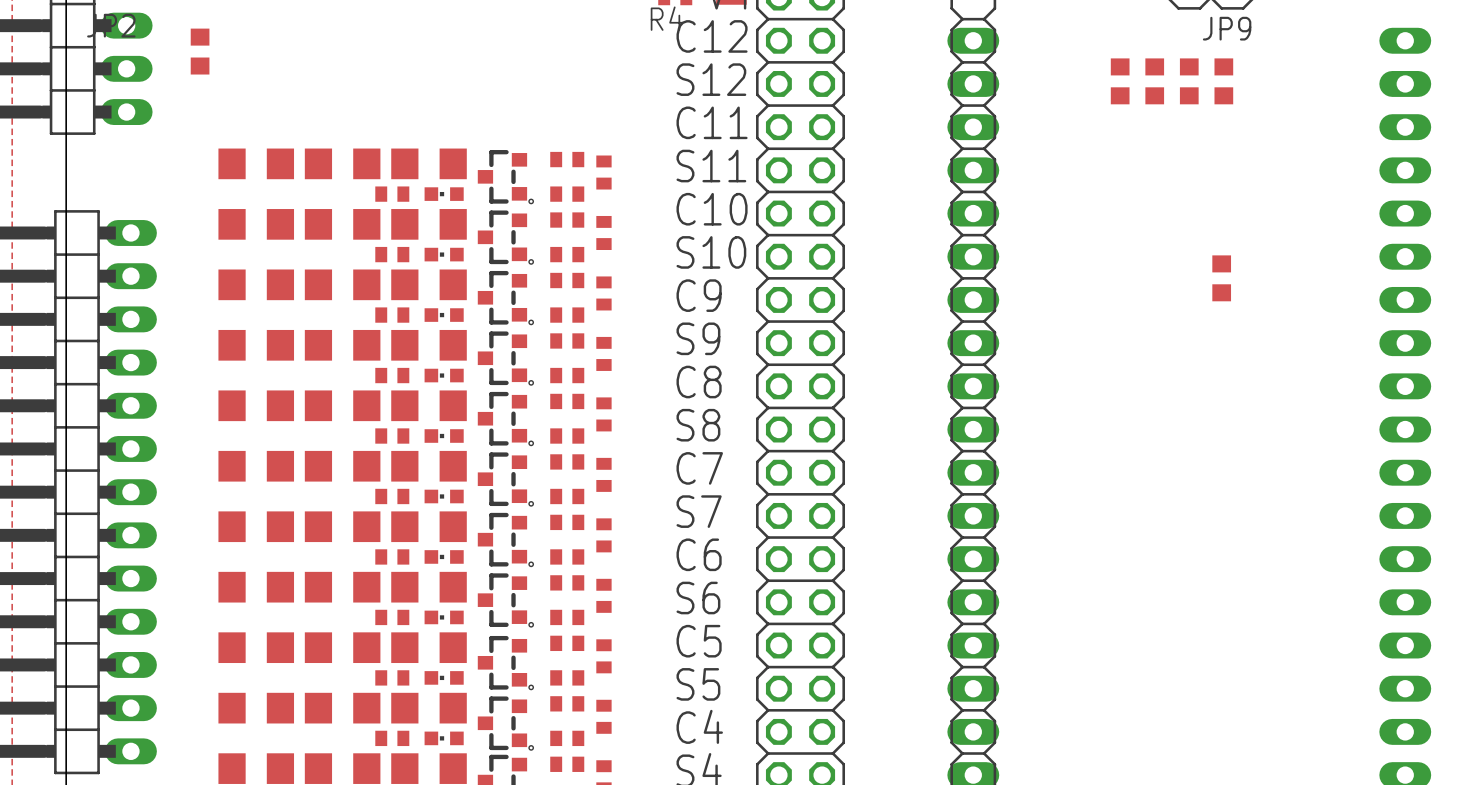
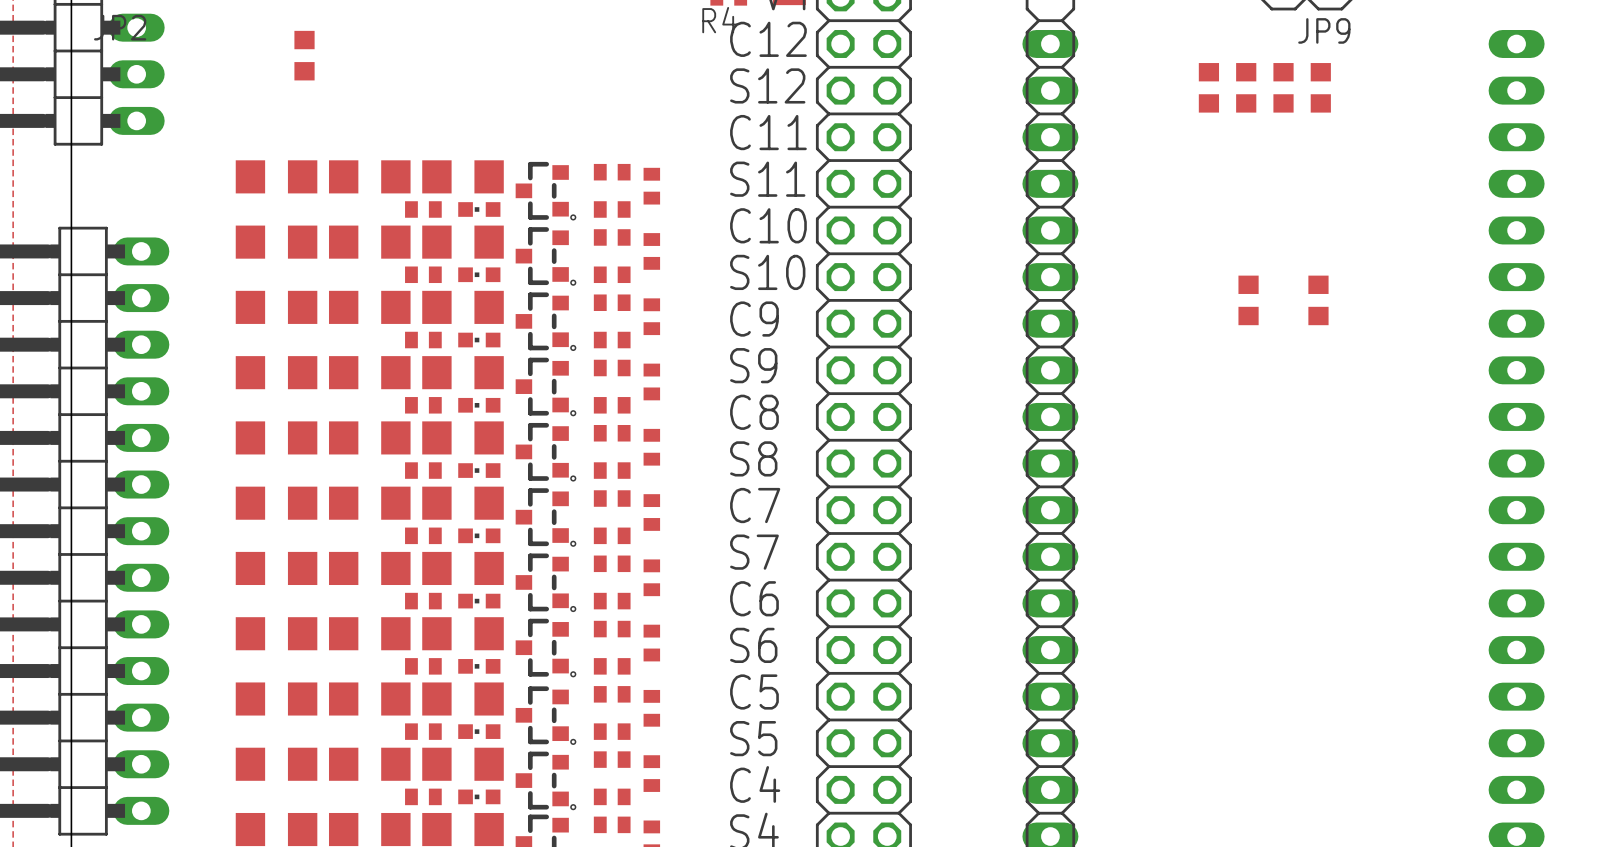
part: (200, 51) -> none
part: none -> (304, 55)
part: none -> (1248, 300)

